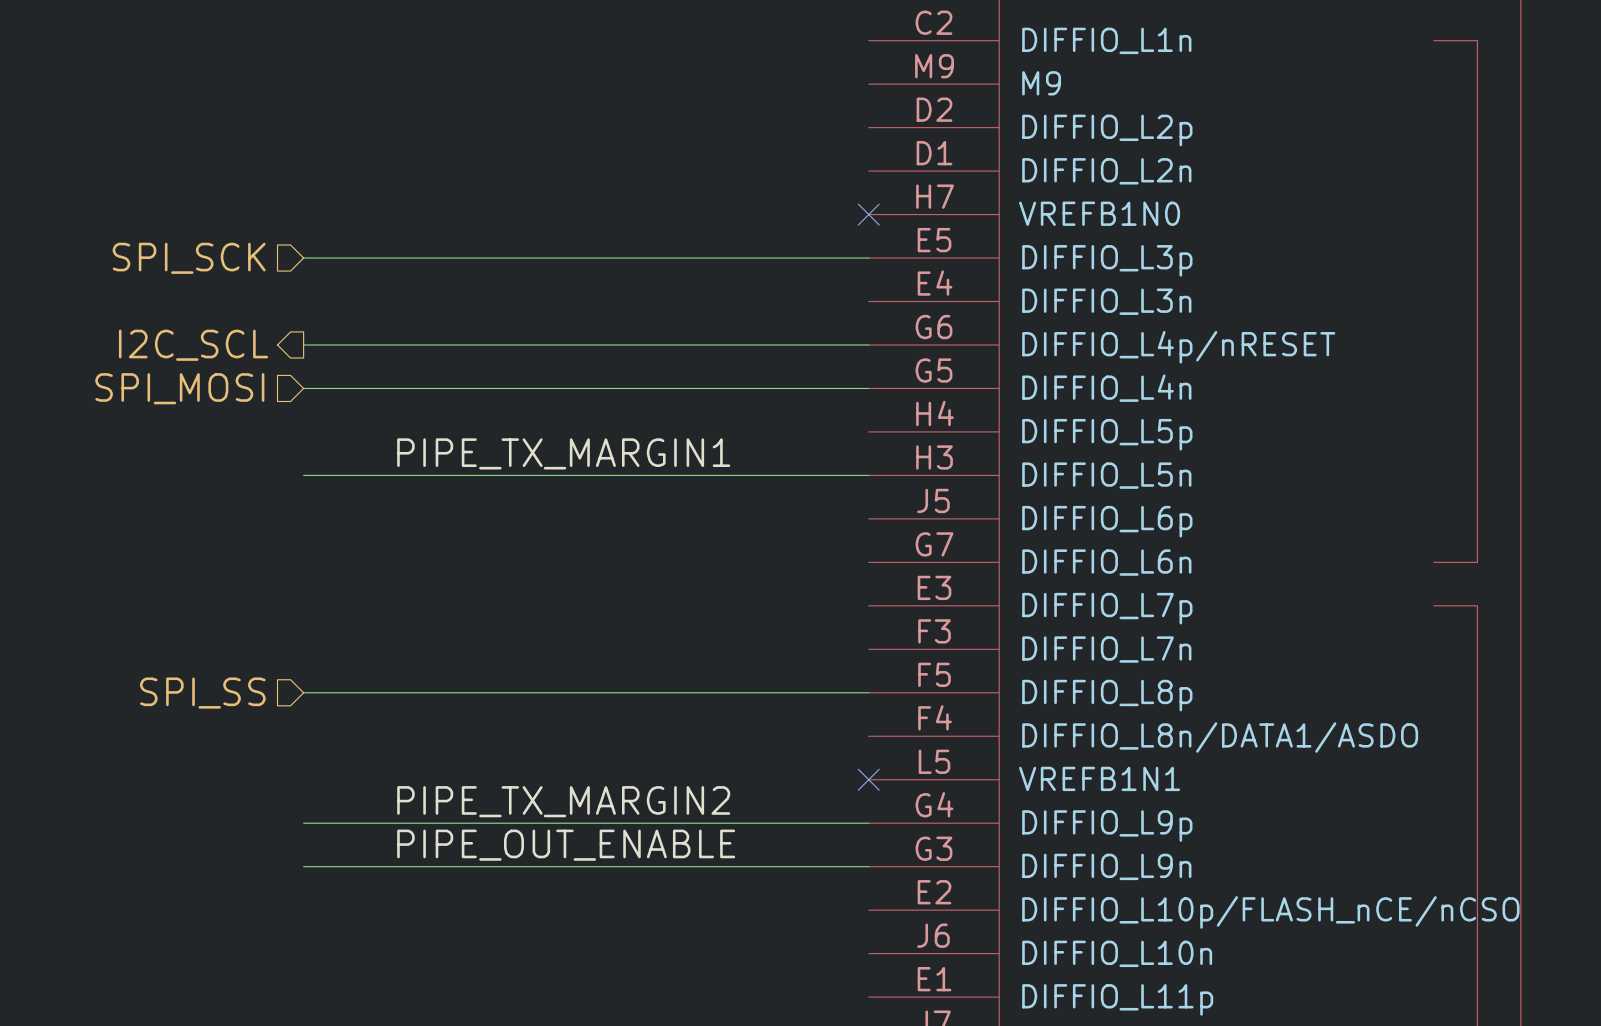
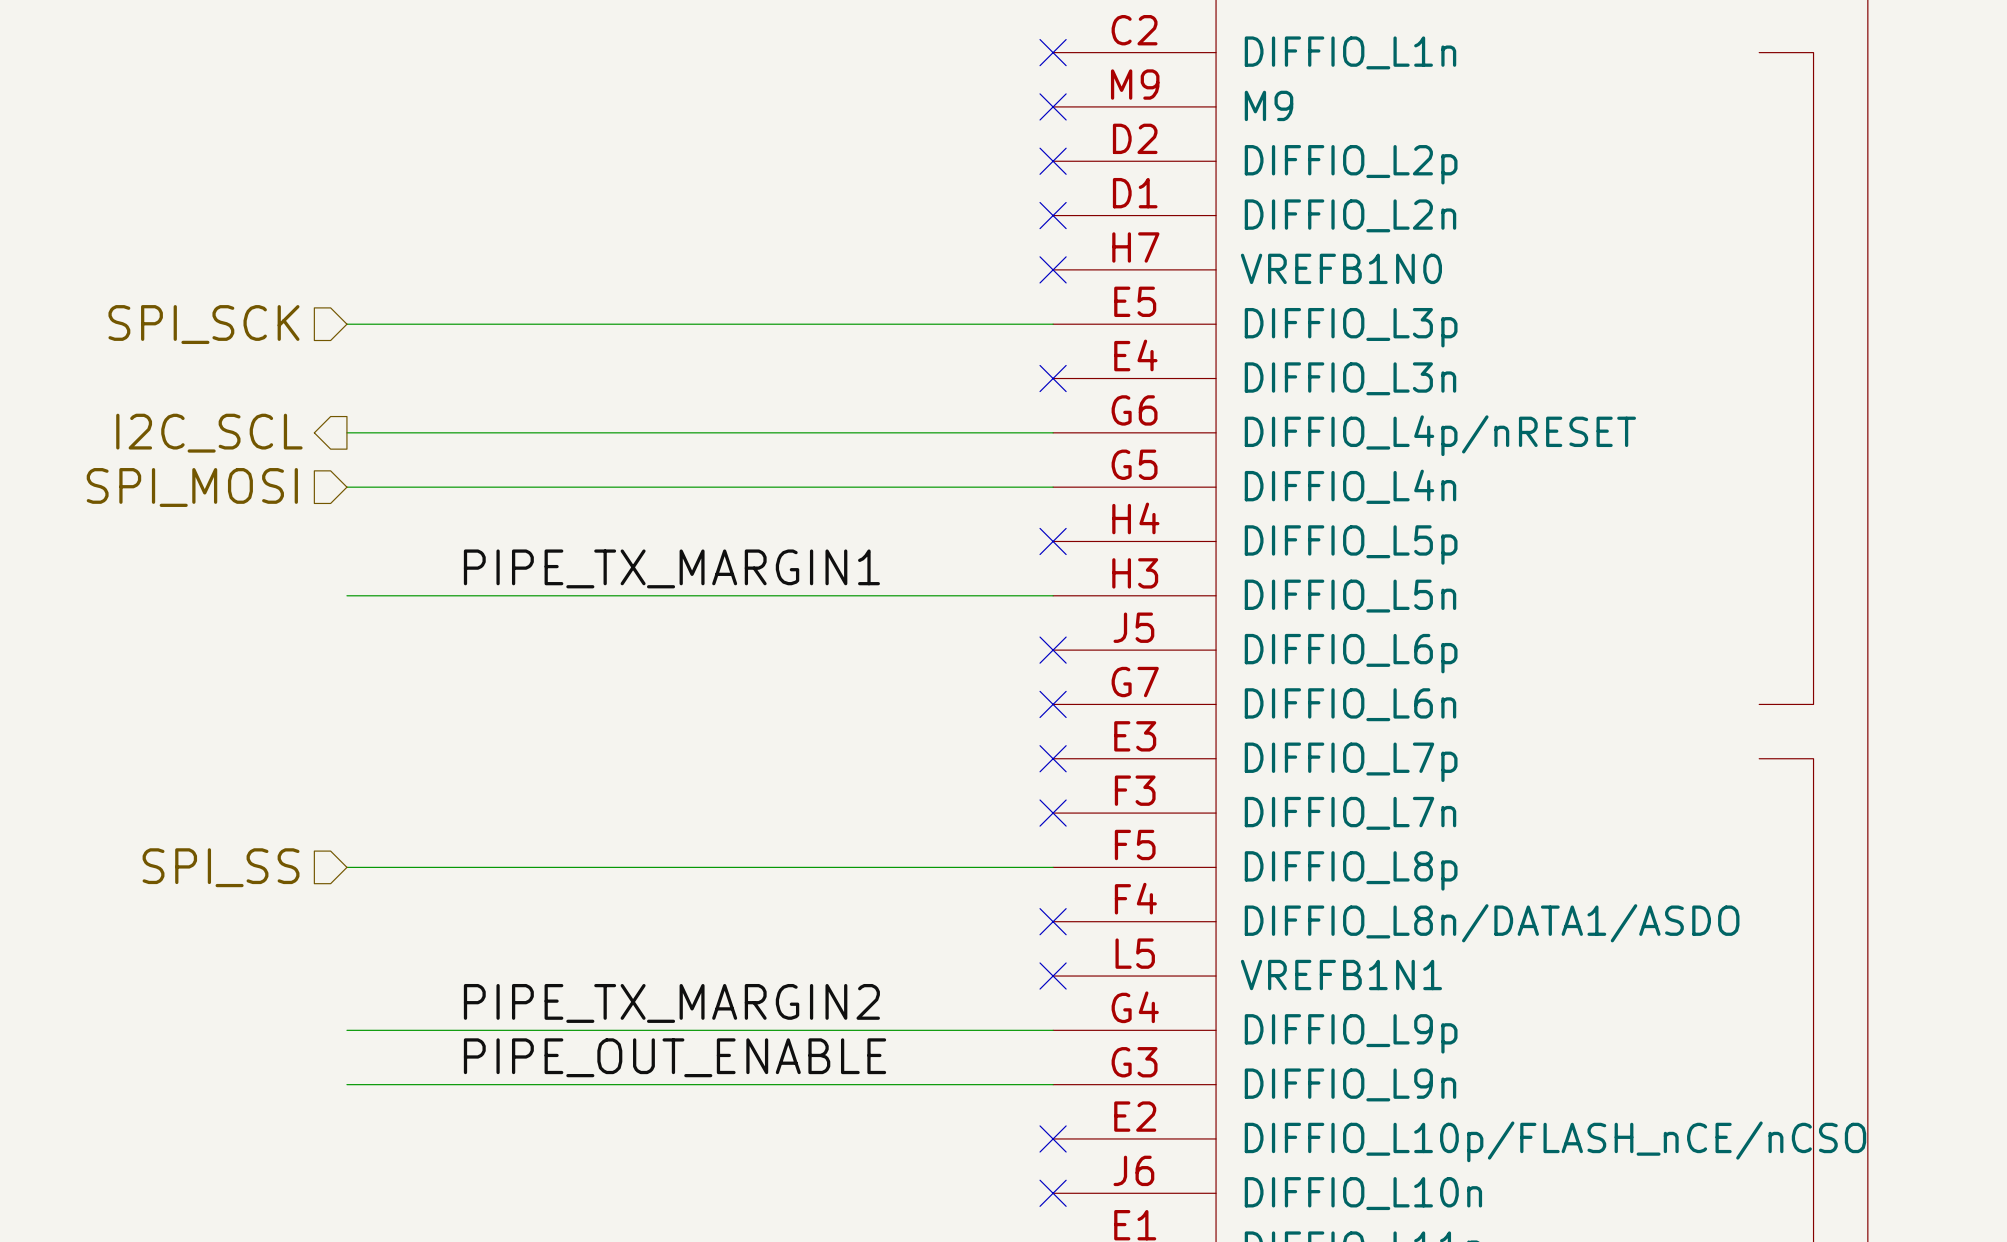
no-connect mark: none -> (1053, 52)
no-connect mark: none -> (1053, 106)
no-connect mark: none -> (1053, 161)
no-connect mark: none -> (1053, 215)
no-connect mark: none -> (1053, 378)
no-connect mark: none -> (1053, 541)
no-connect mark: none -> (1053, 650)
no-connect mark: none -> (1053, 704)
no-connect mark: none -> (1053, 758)
no-connect mark: none -> (1053, 813)
no-connect mark: none -> (1053, 921)
no-connect mark: none -> (1053, 1138)
no-connect mark: none -> (1053, 1193)

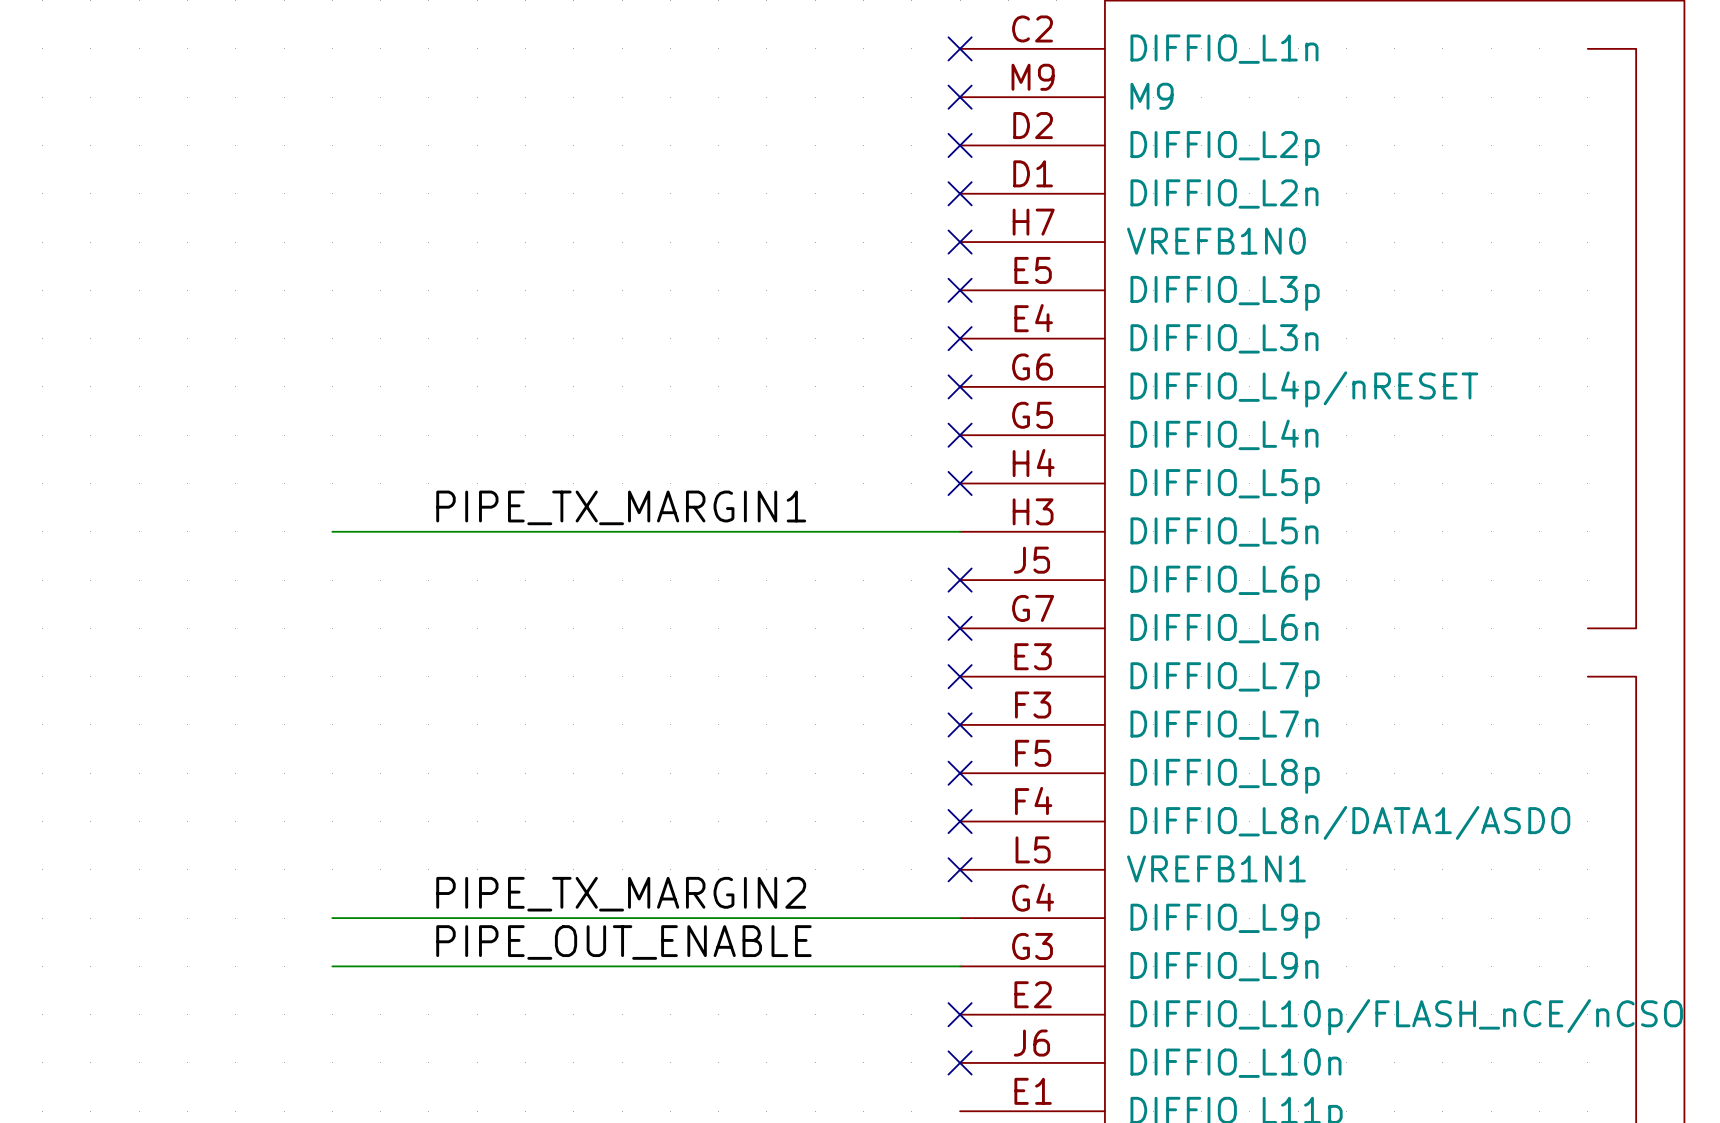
hierarchical label: SPI_SCK (203, 324) -> none
wire: (346, 324) (1053, 324) -> none
no-connect mark: none -> (960, 290)
wire: (346, 432) (1053, 432) -> none
no-connect mark: none -> (960, 386)
hierarchical label: I2C_SCL (209, 433) -> none
hierarchical label: SPI_MOSI (192, 487) -> none
wire: (346, 487) (1053, 487) -> none
no-connect mark: none -> (960, 435)
hierarchical label: SPI_SS (221, 867) -> none
wire: (346, 867) (1053, 867) -> none
no-connect mark: none -> (960, 773)

